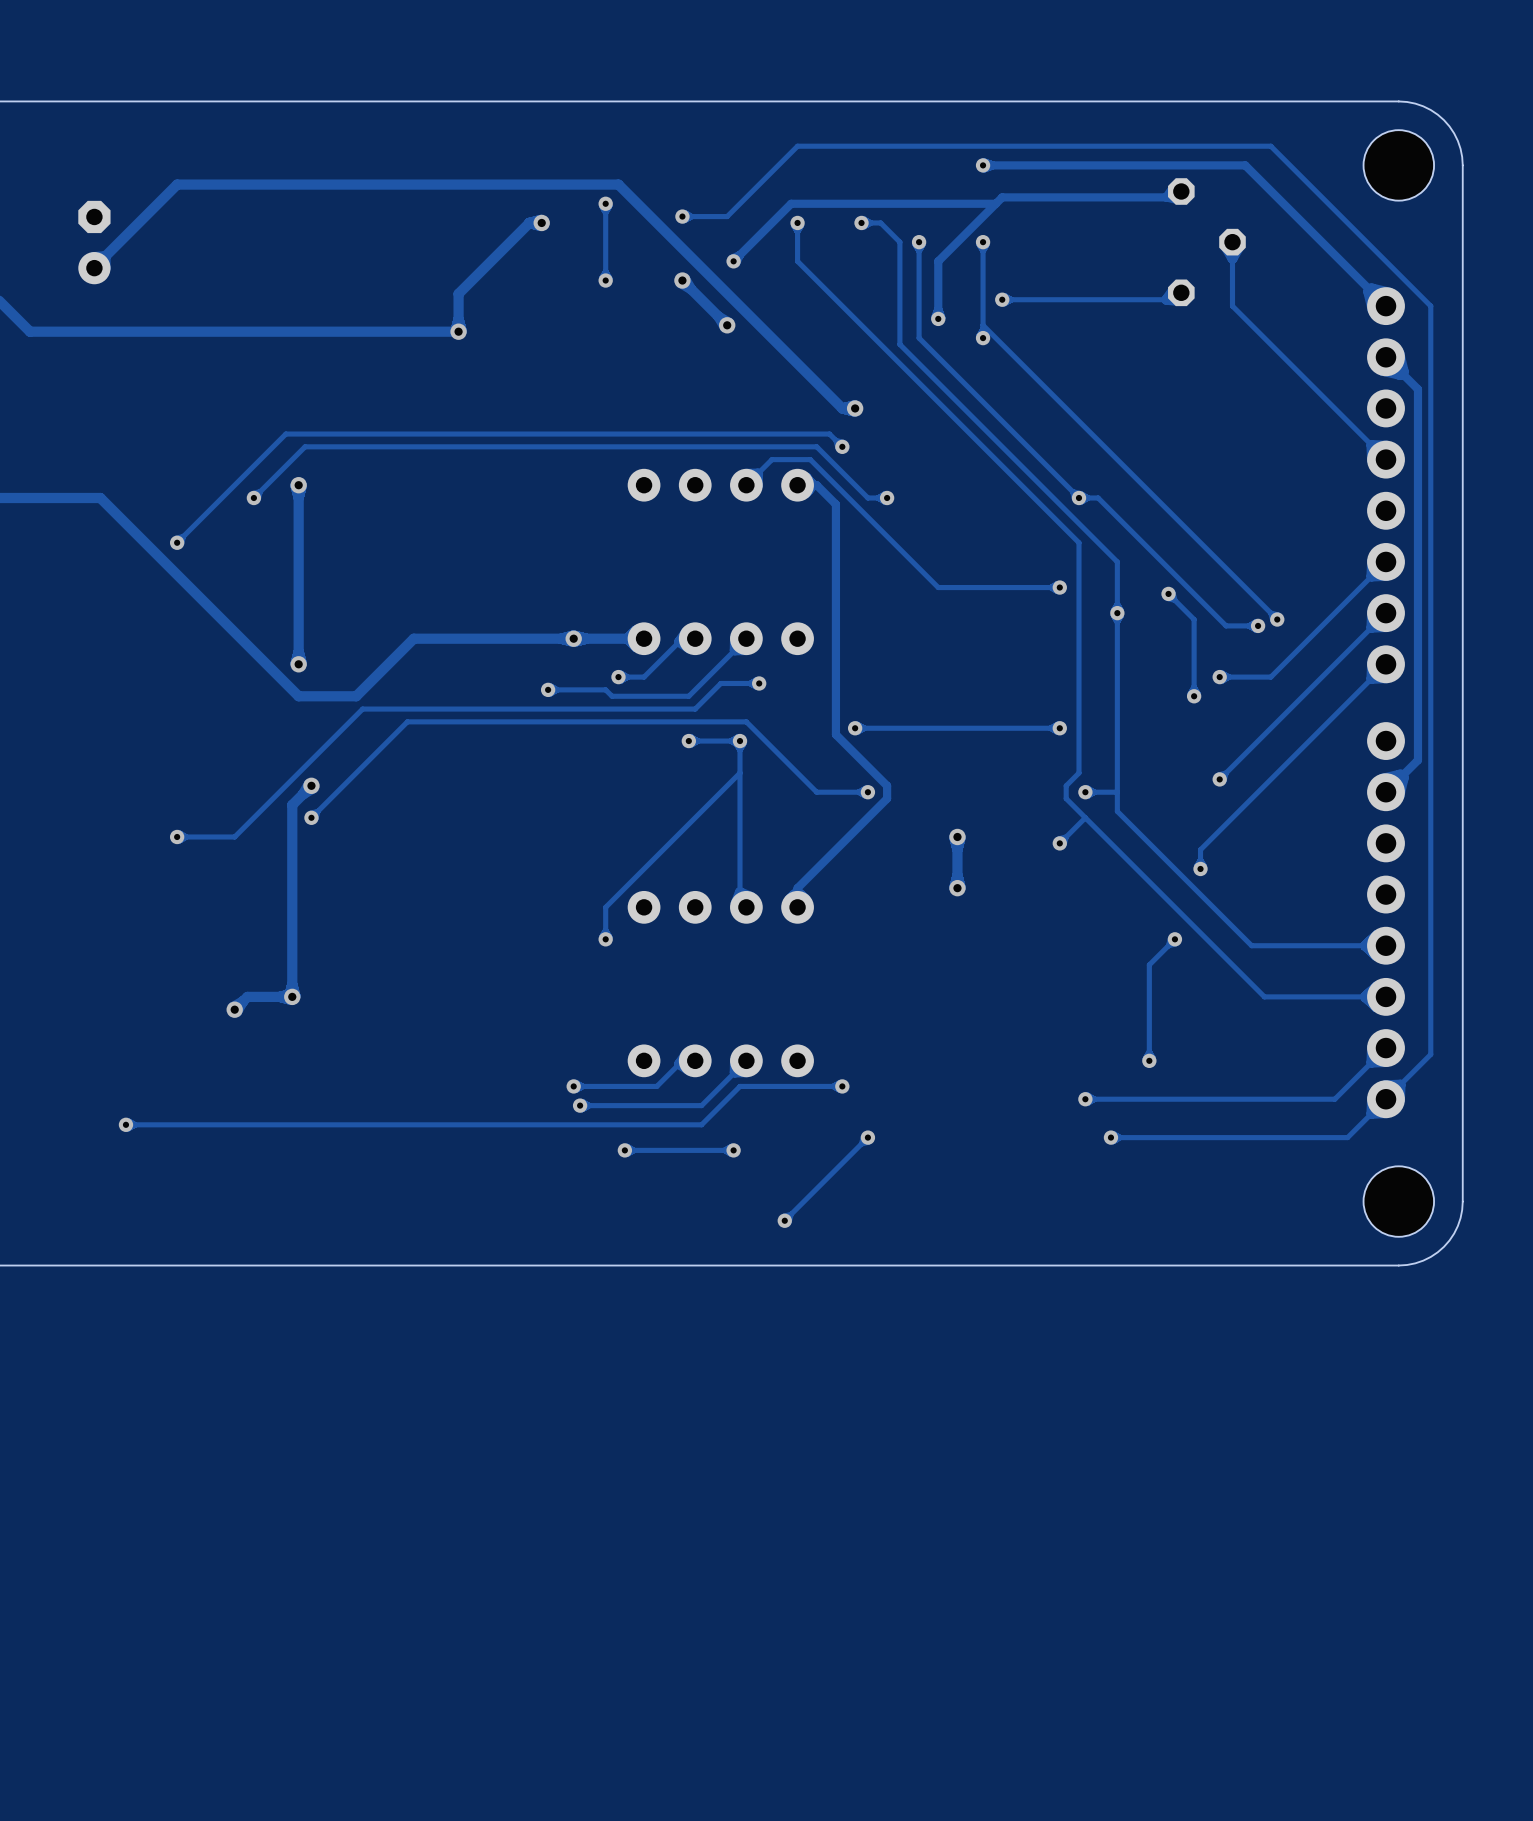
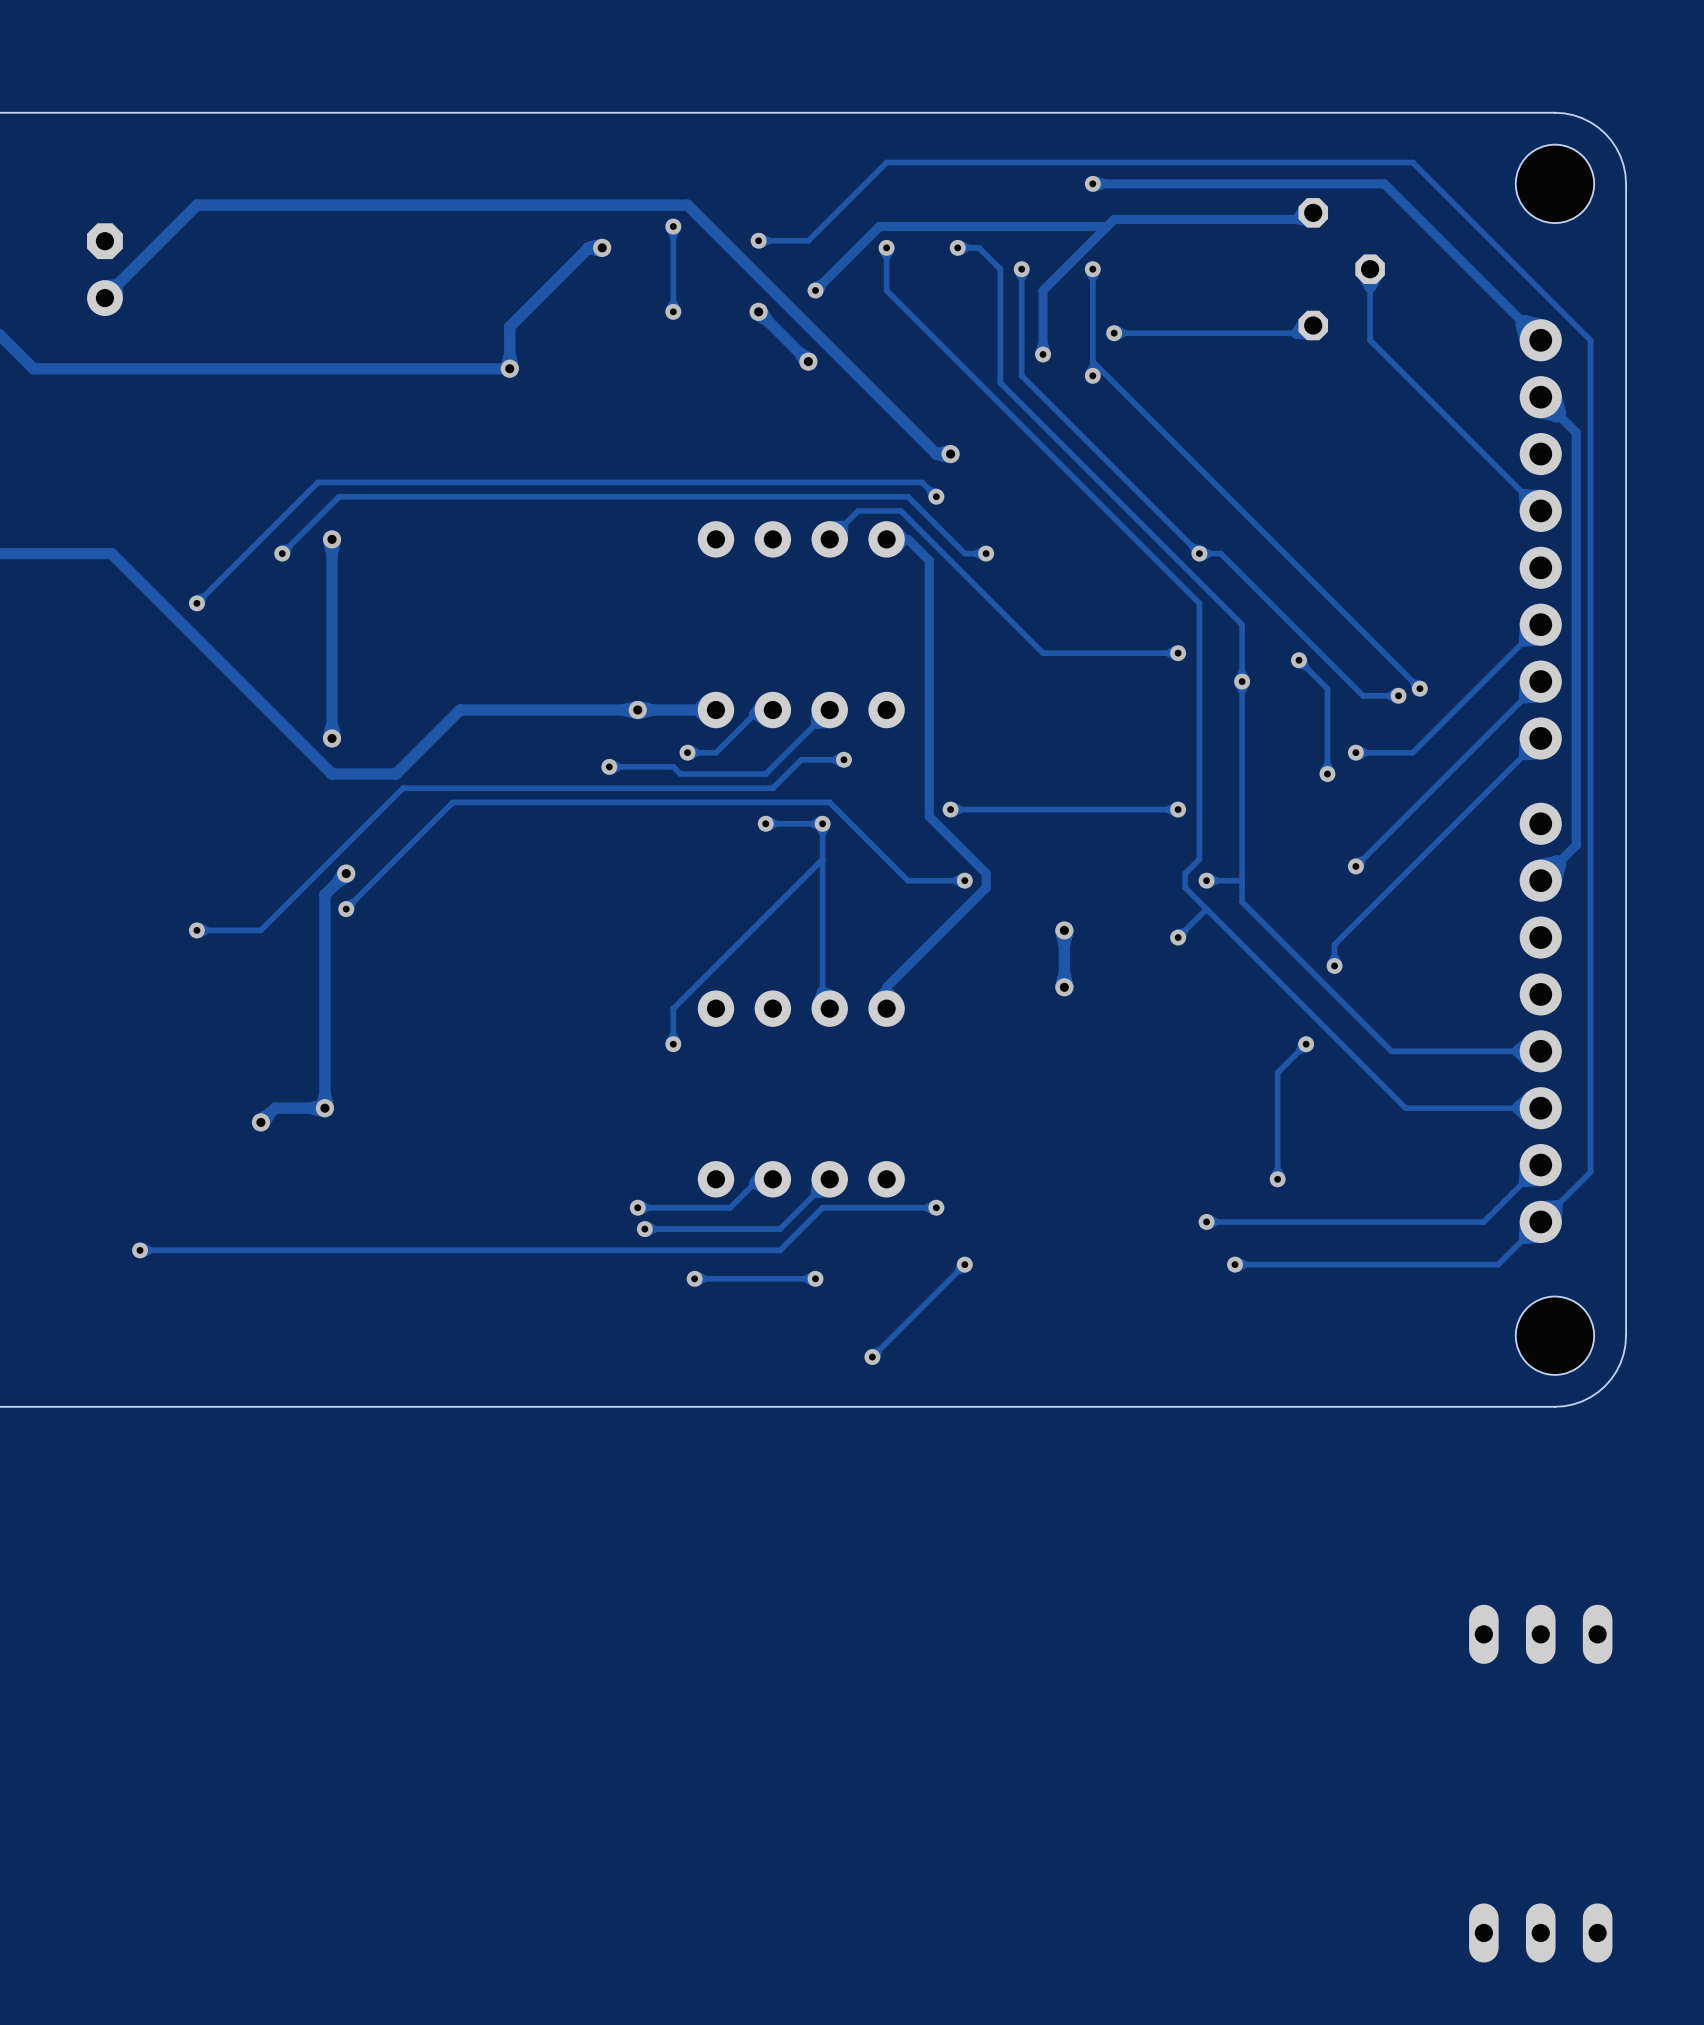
part: none -> (1540, 1634)
part: none -> (1540, 1932)

